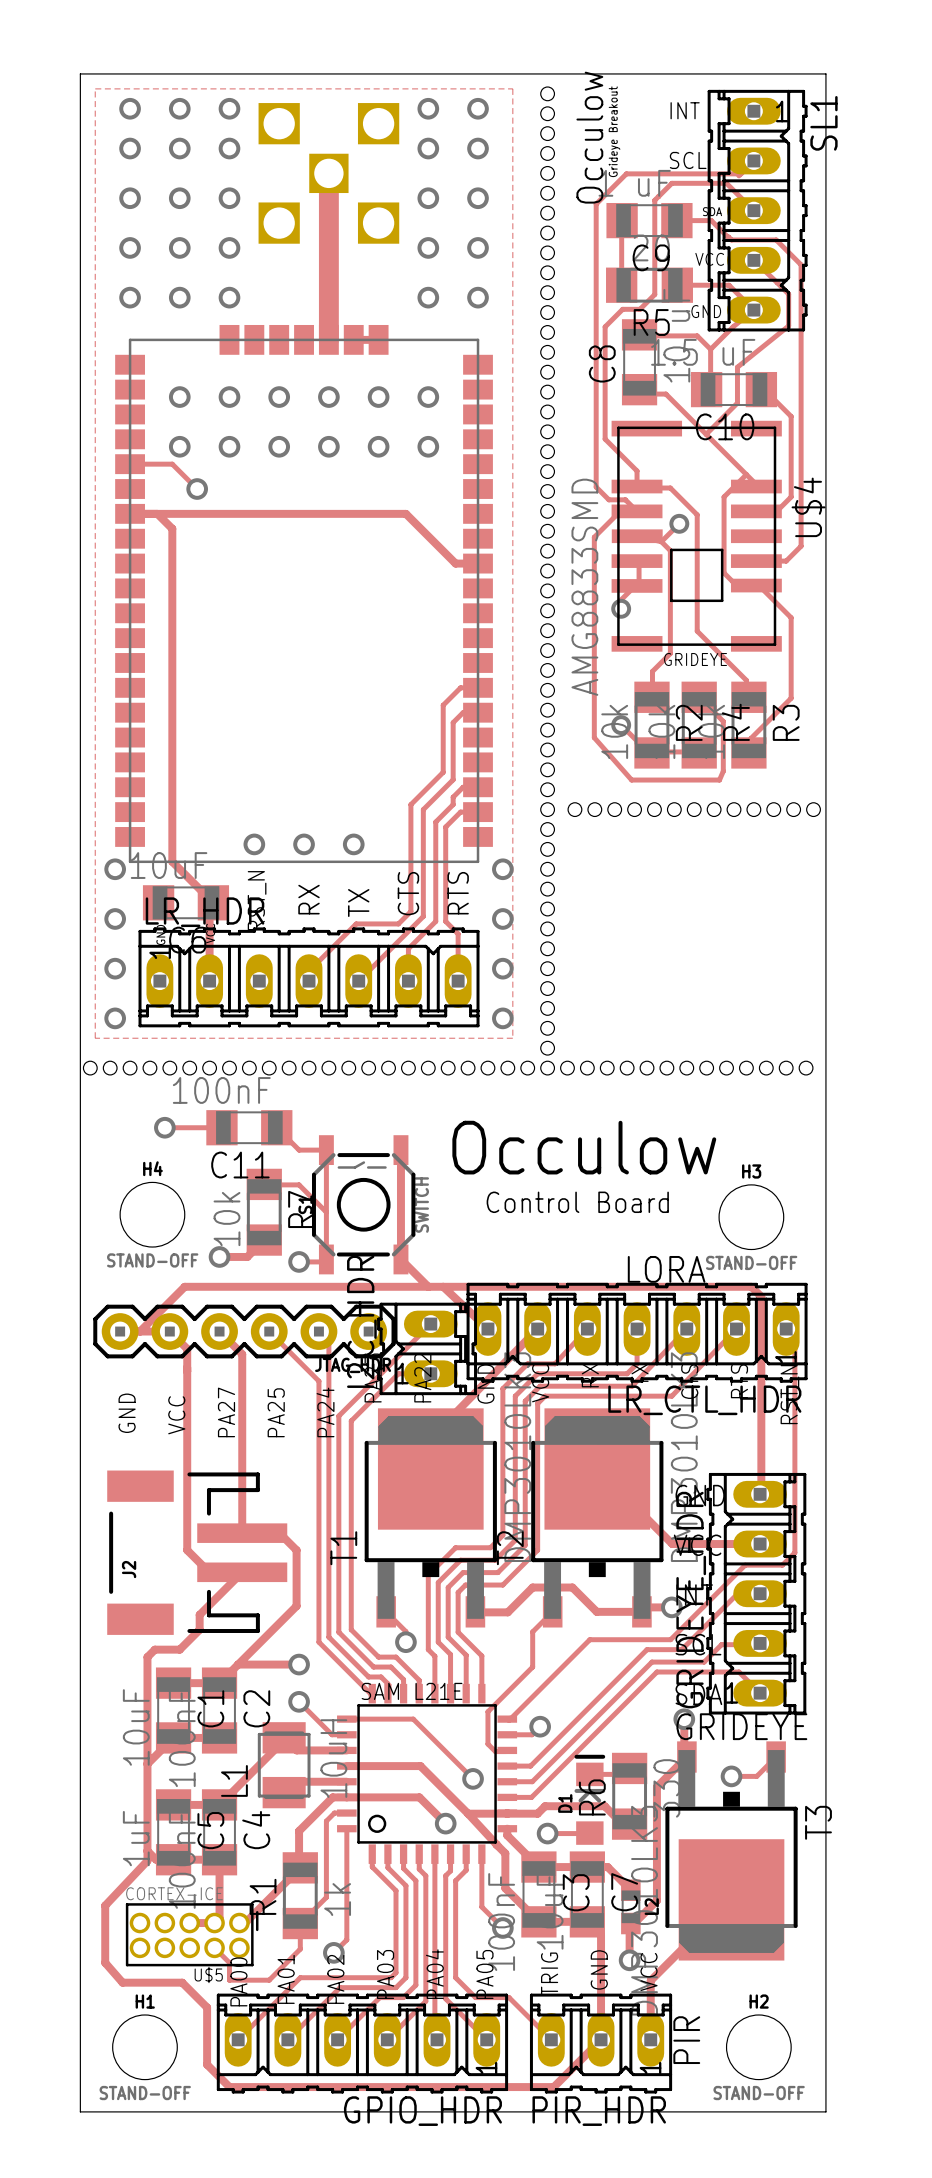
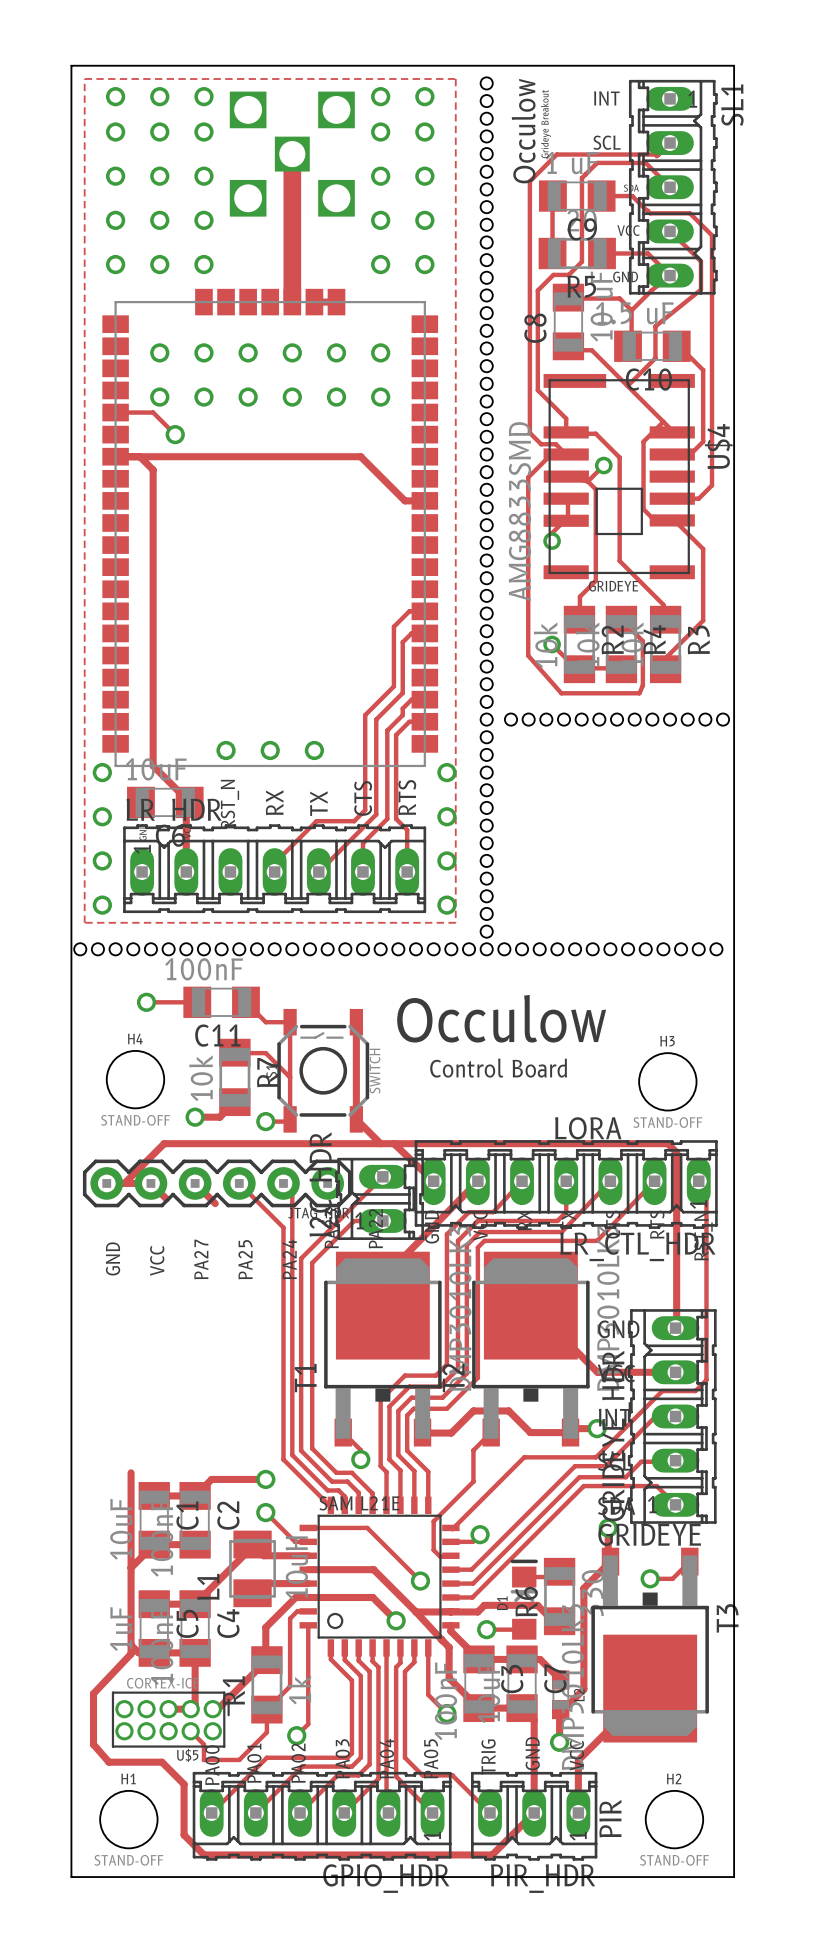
track: (187, 1348) (187, 1550) (209, 1572) (242, 1572) (199, 1614) (199, 1629) (179, 1649) (154, 1649) (147, 1657) -> none
track: (242, 1354) (242, 1533) (279, 1533) (296, 1550) (296, 1606) (238, 1664) -> none
J2: (197, 1552) -> none

